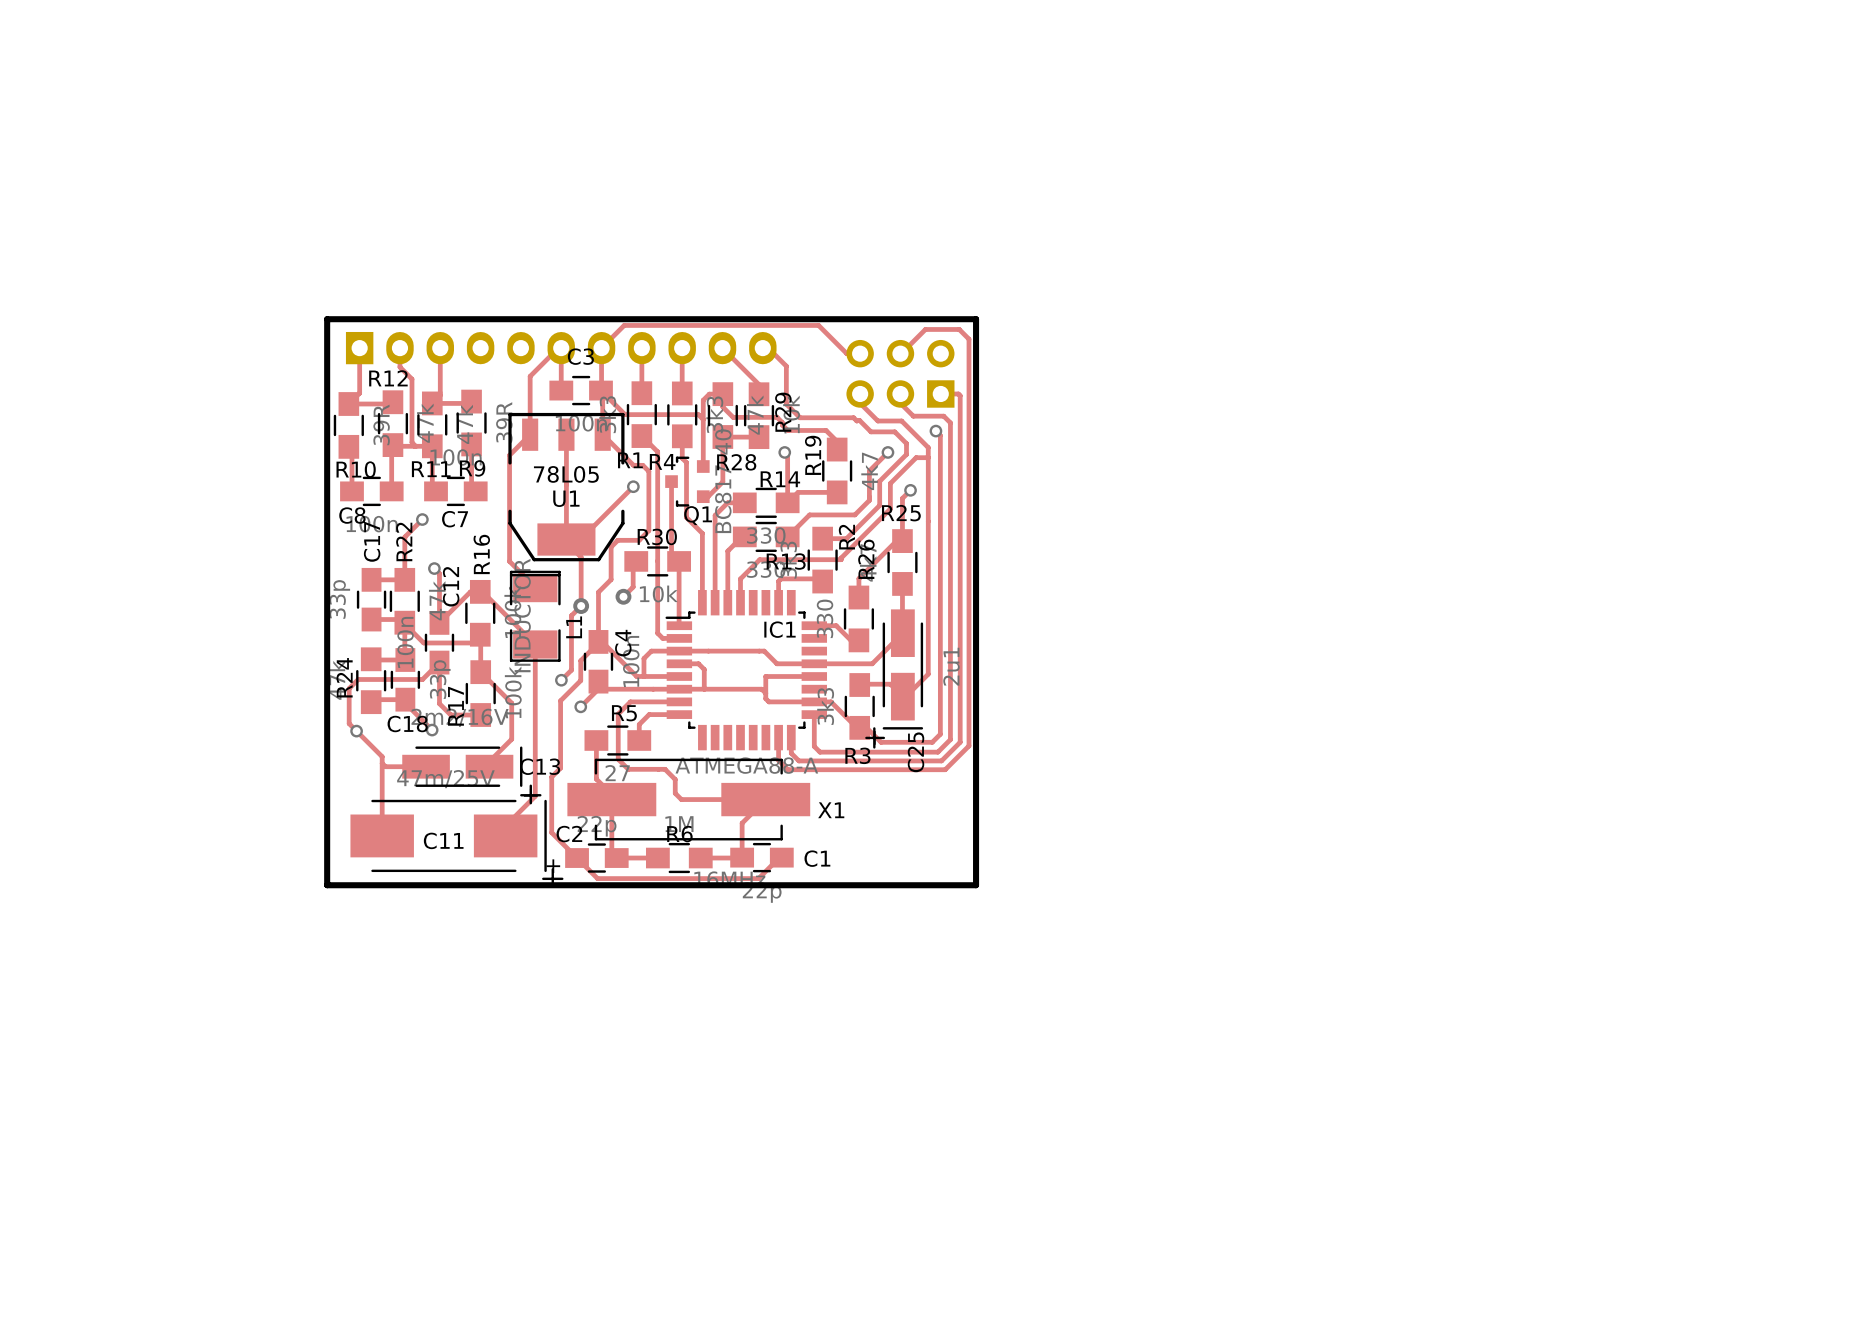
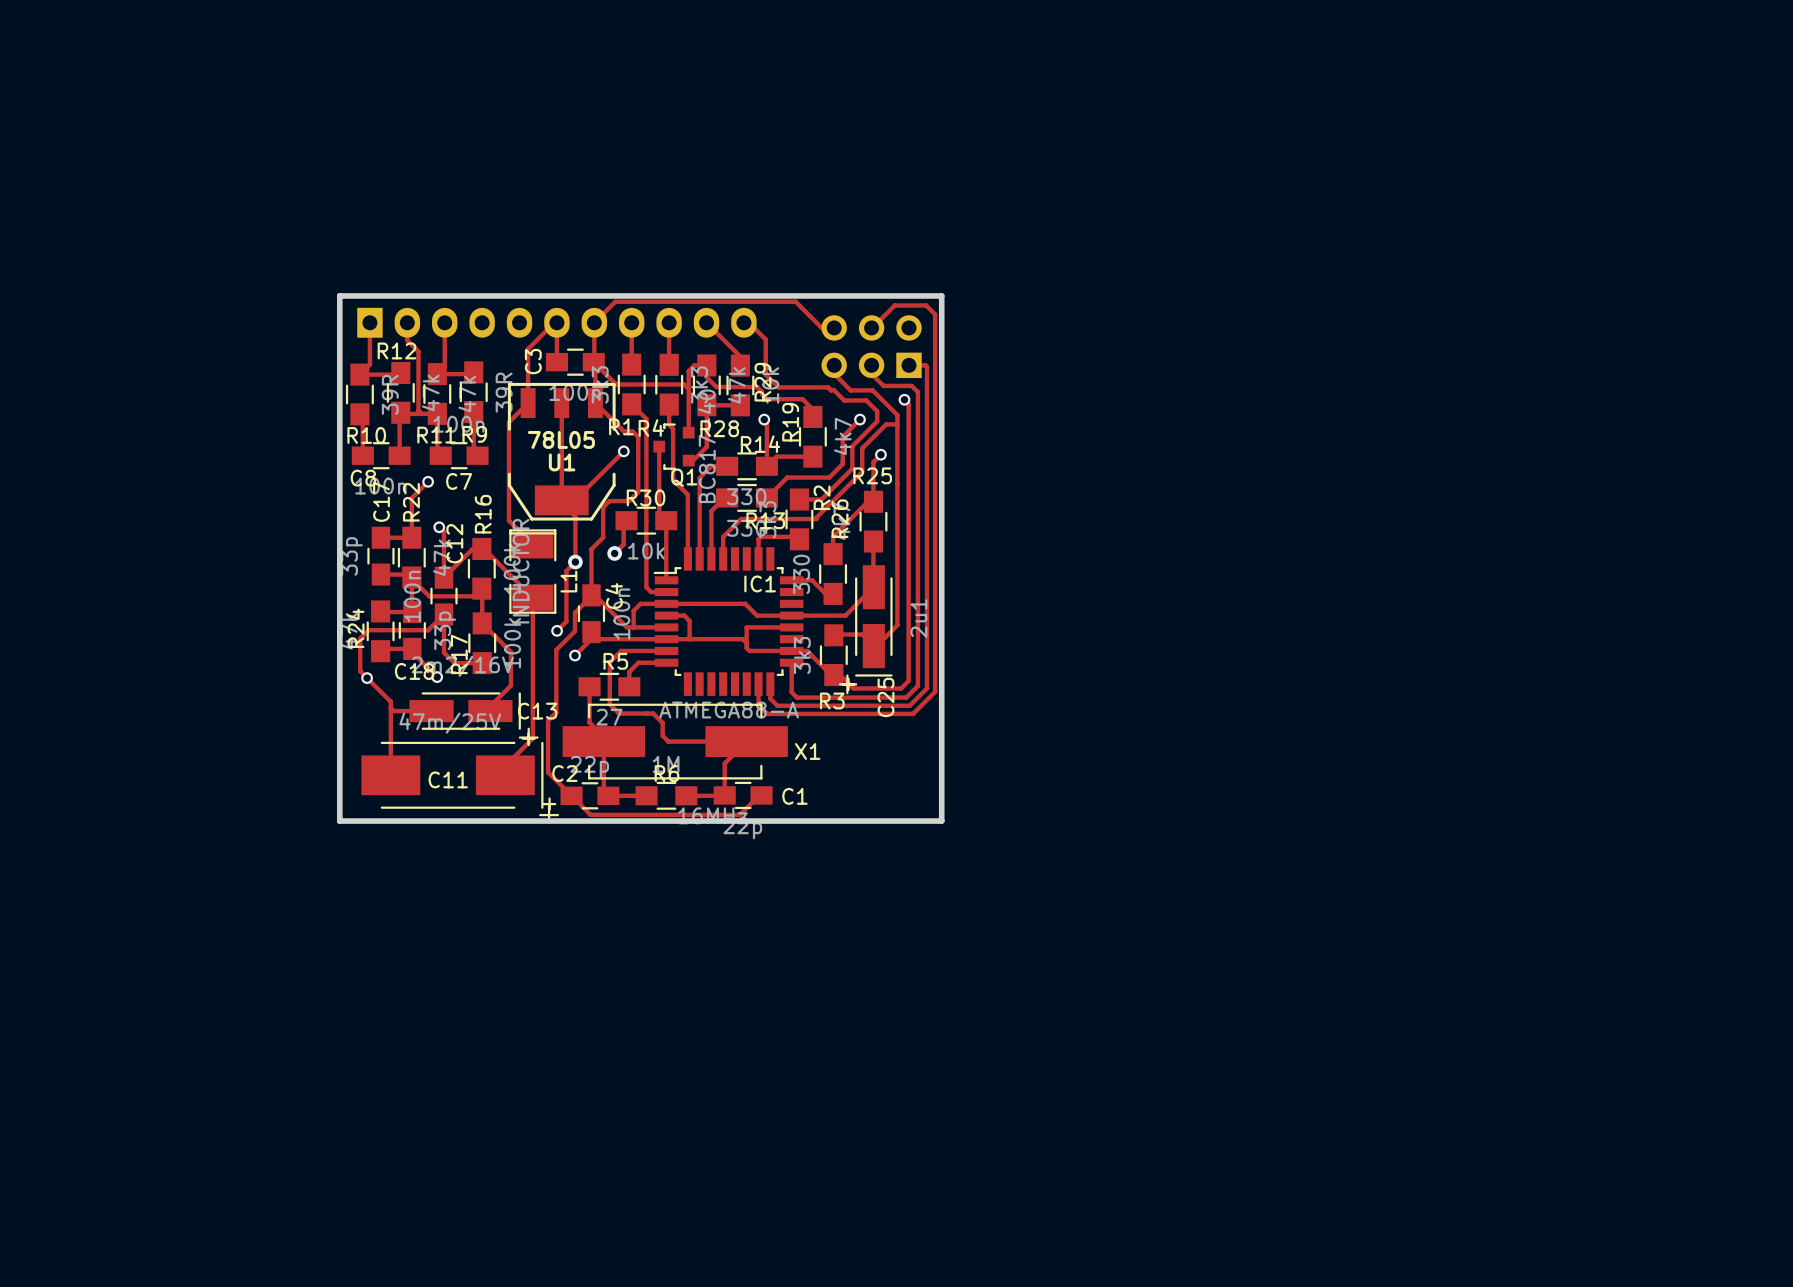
C3 name rotation: 0° (580, 356) -> 90° counterclockwise (533, 361)
C3 name position: C3 (580, 356) -> C3 (533, 361)

